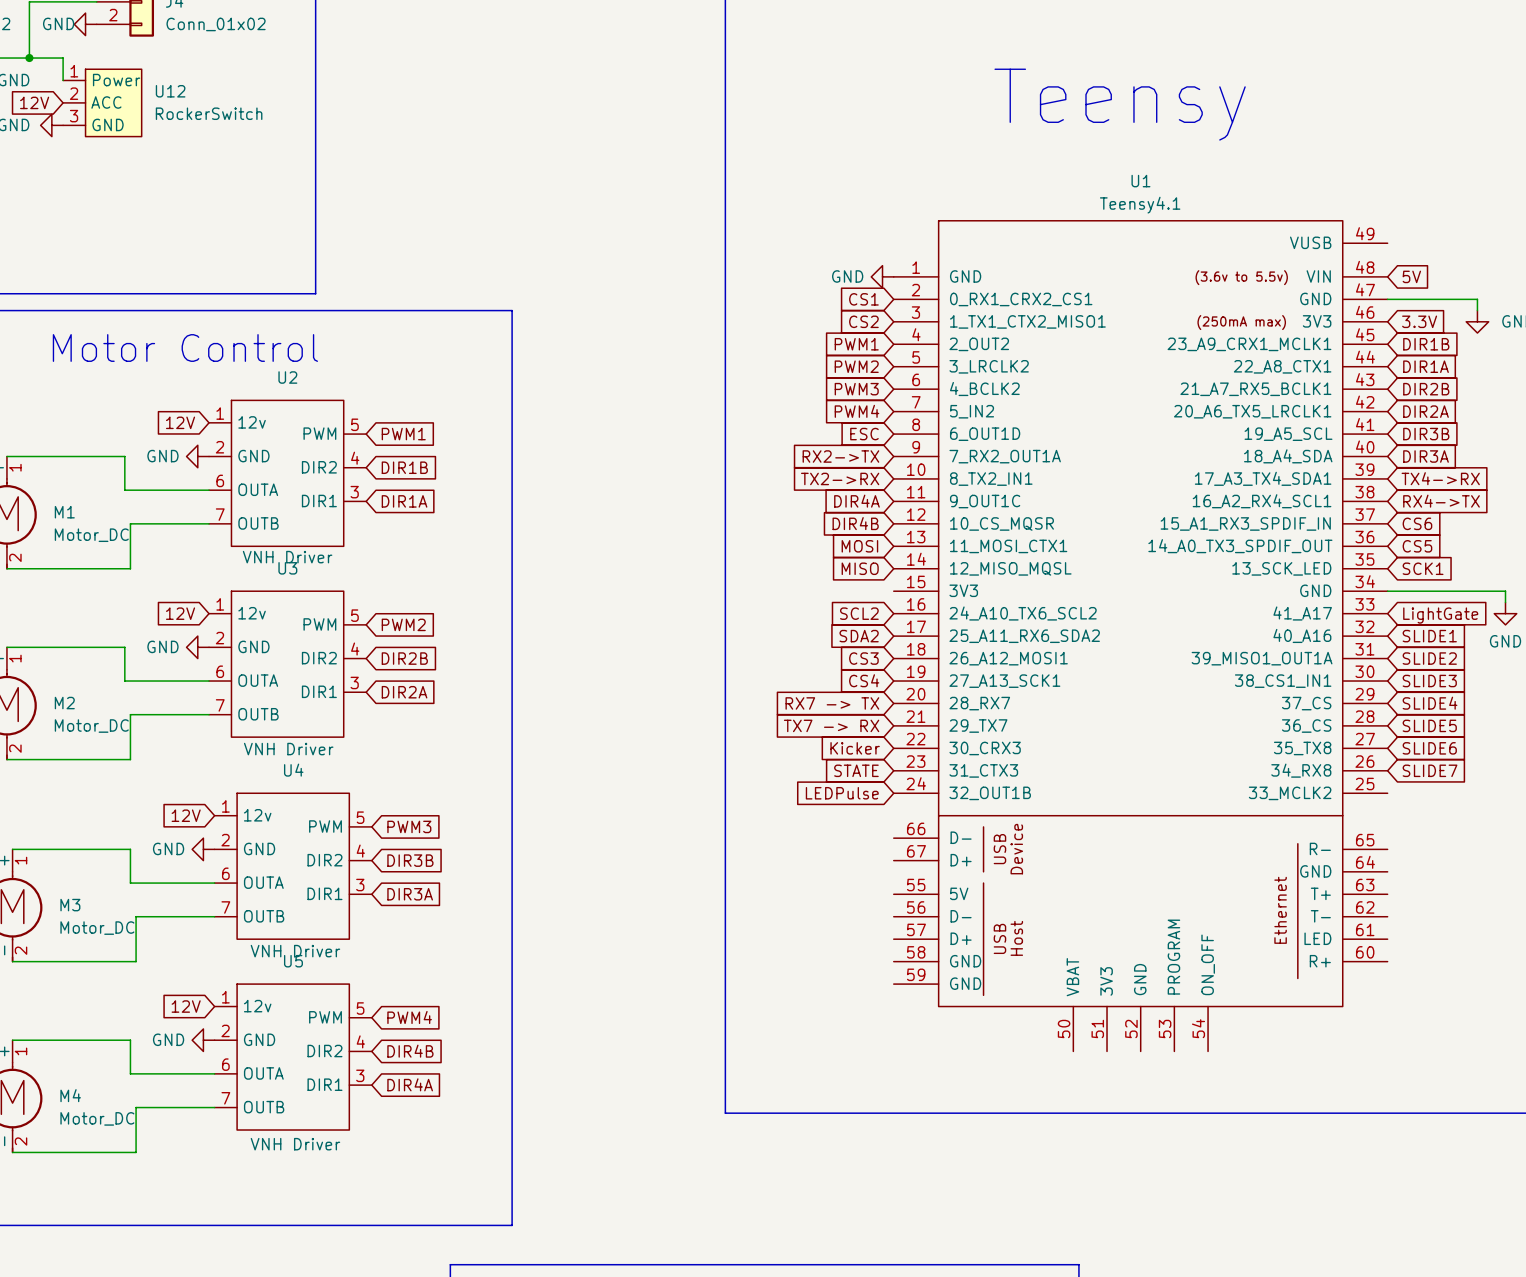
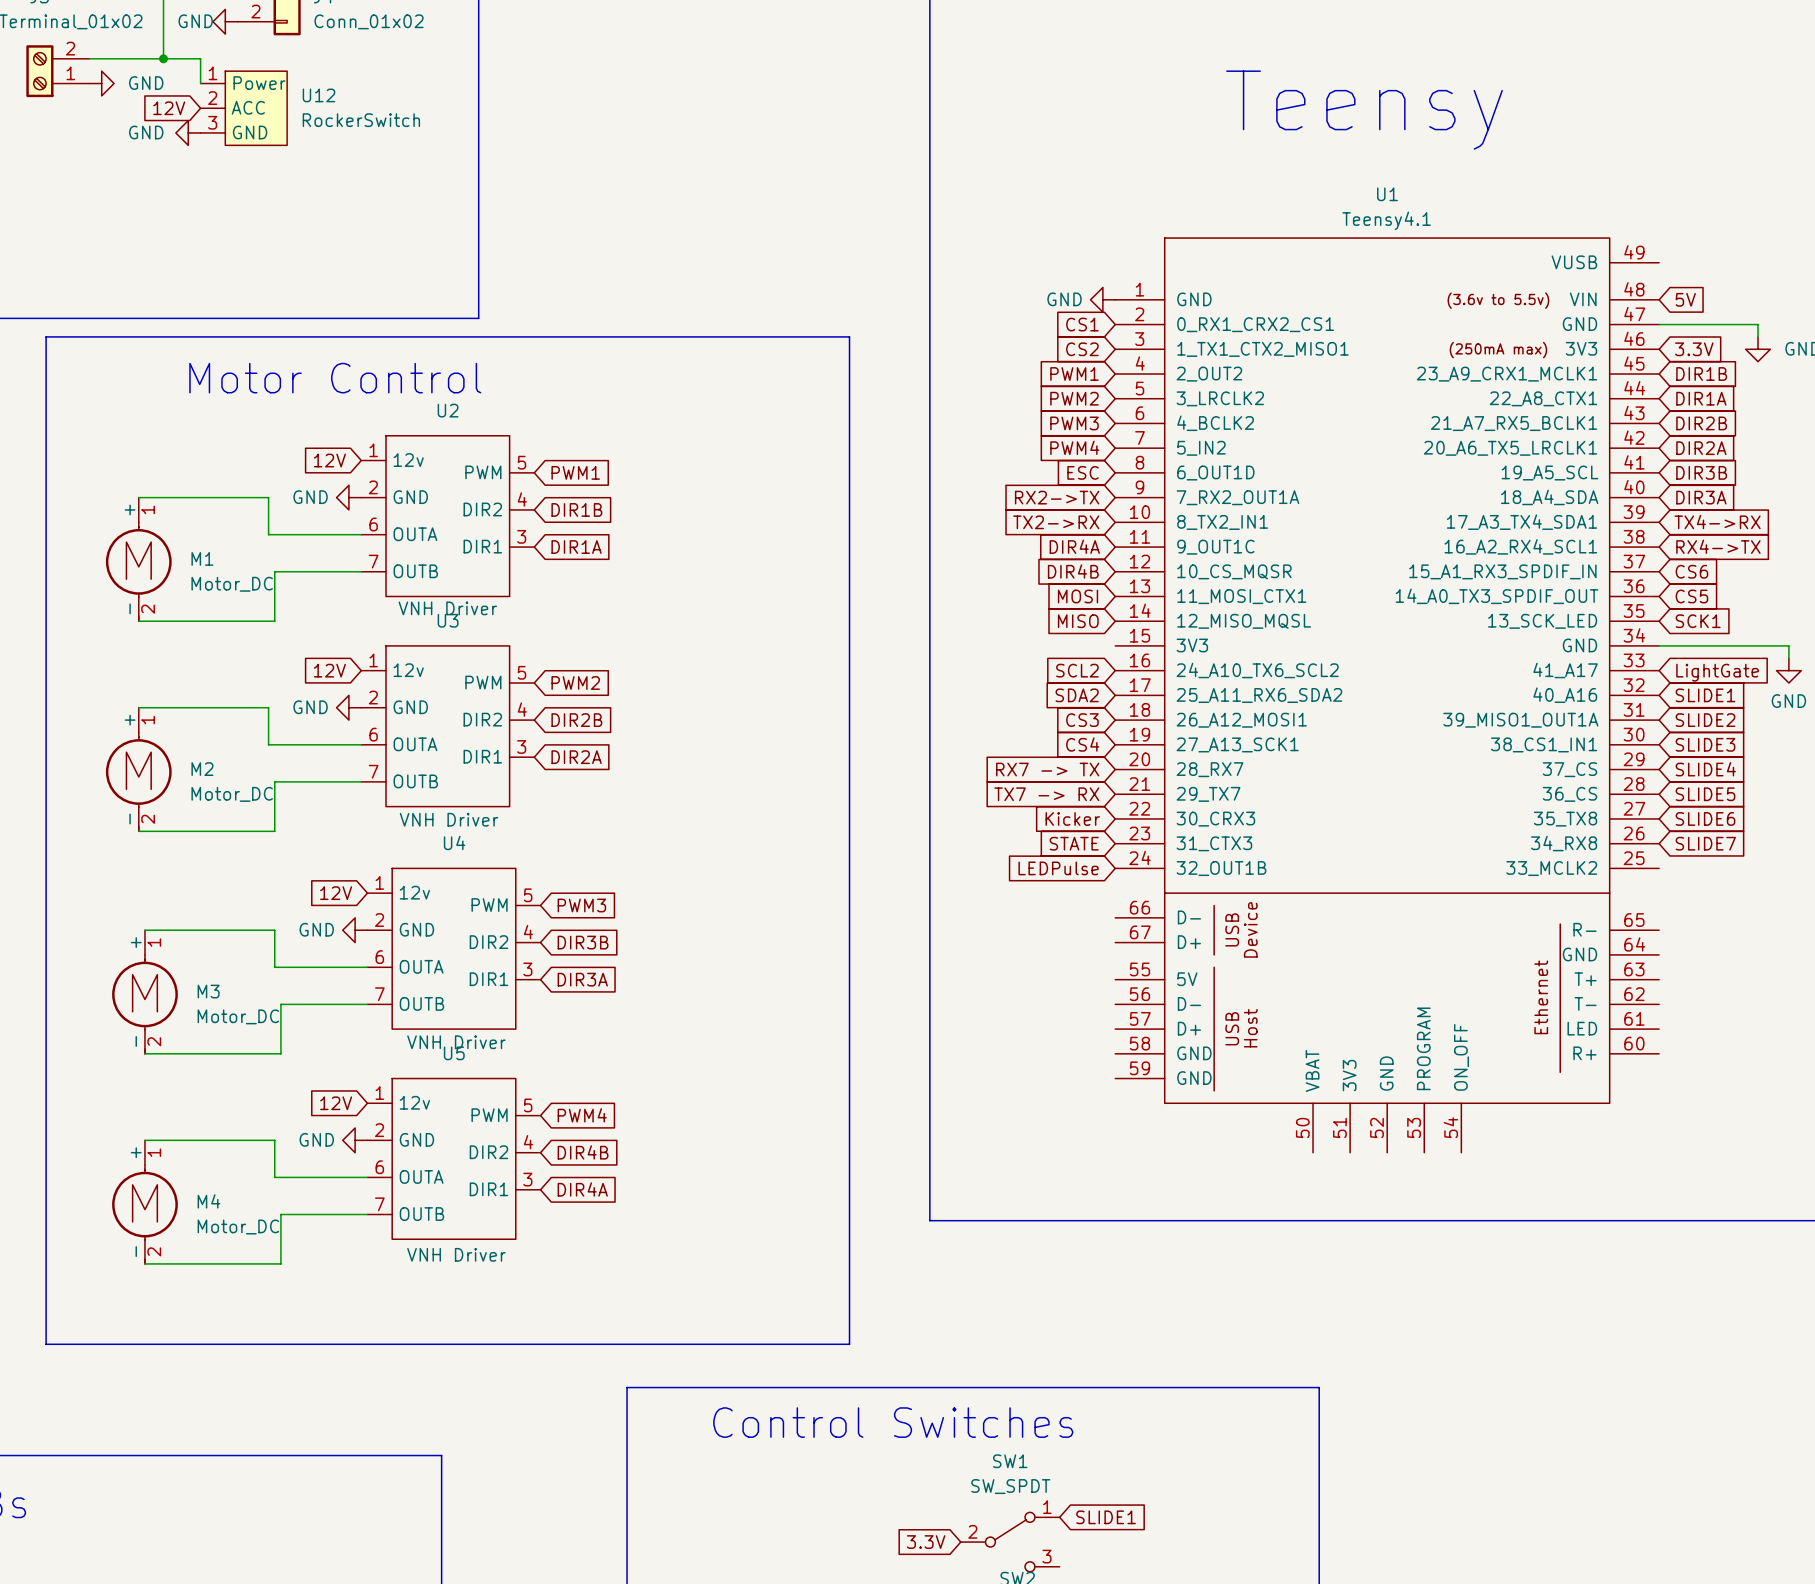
line: (512, 310) (512, 1225) -> (695, 336) (849, 336) (849, 1344) (695, 1344)

